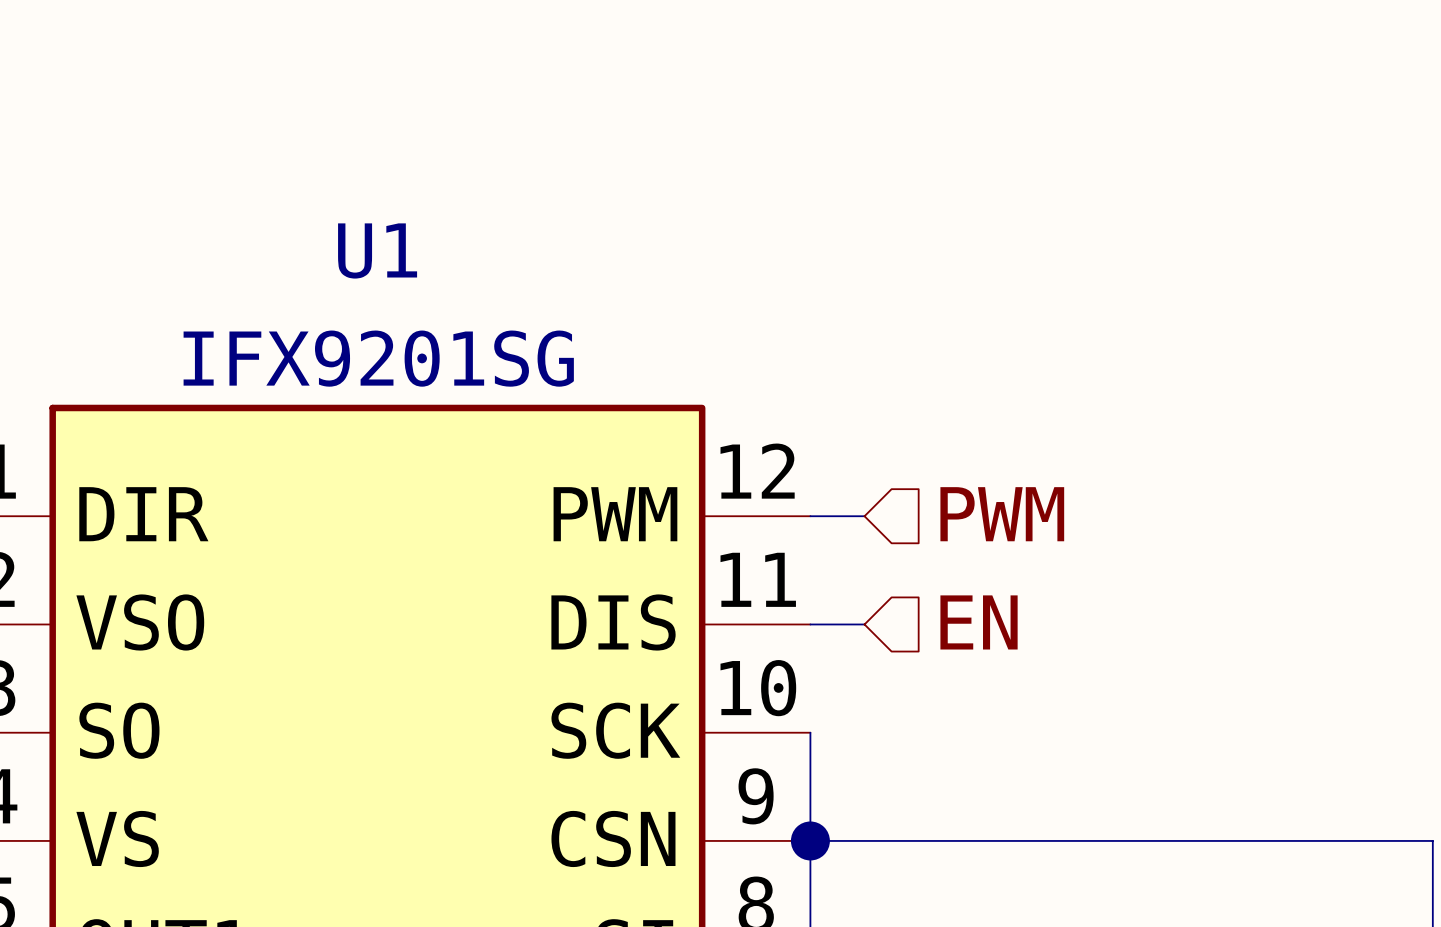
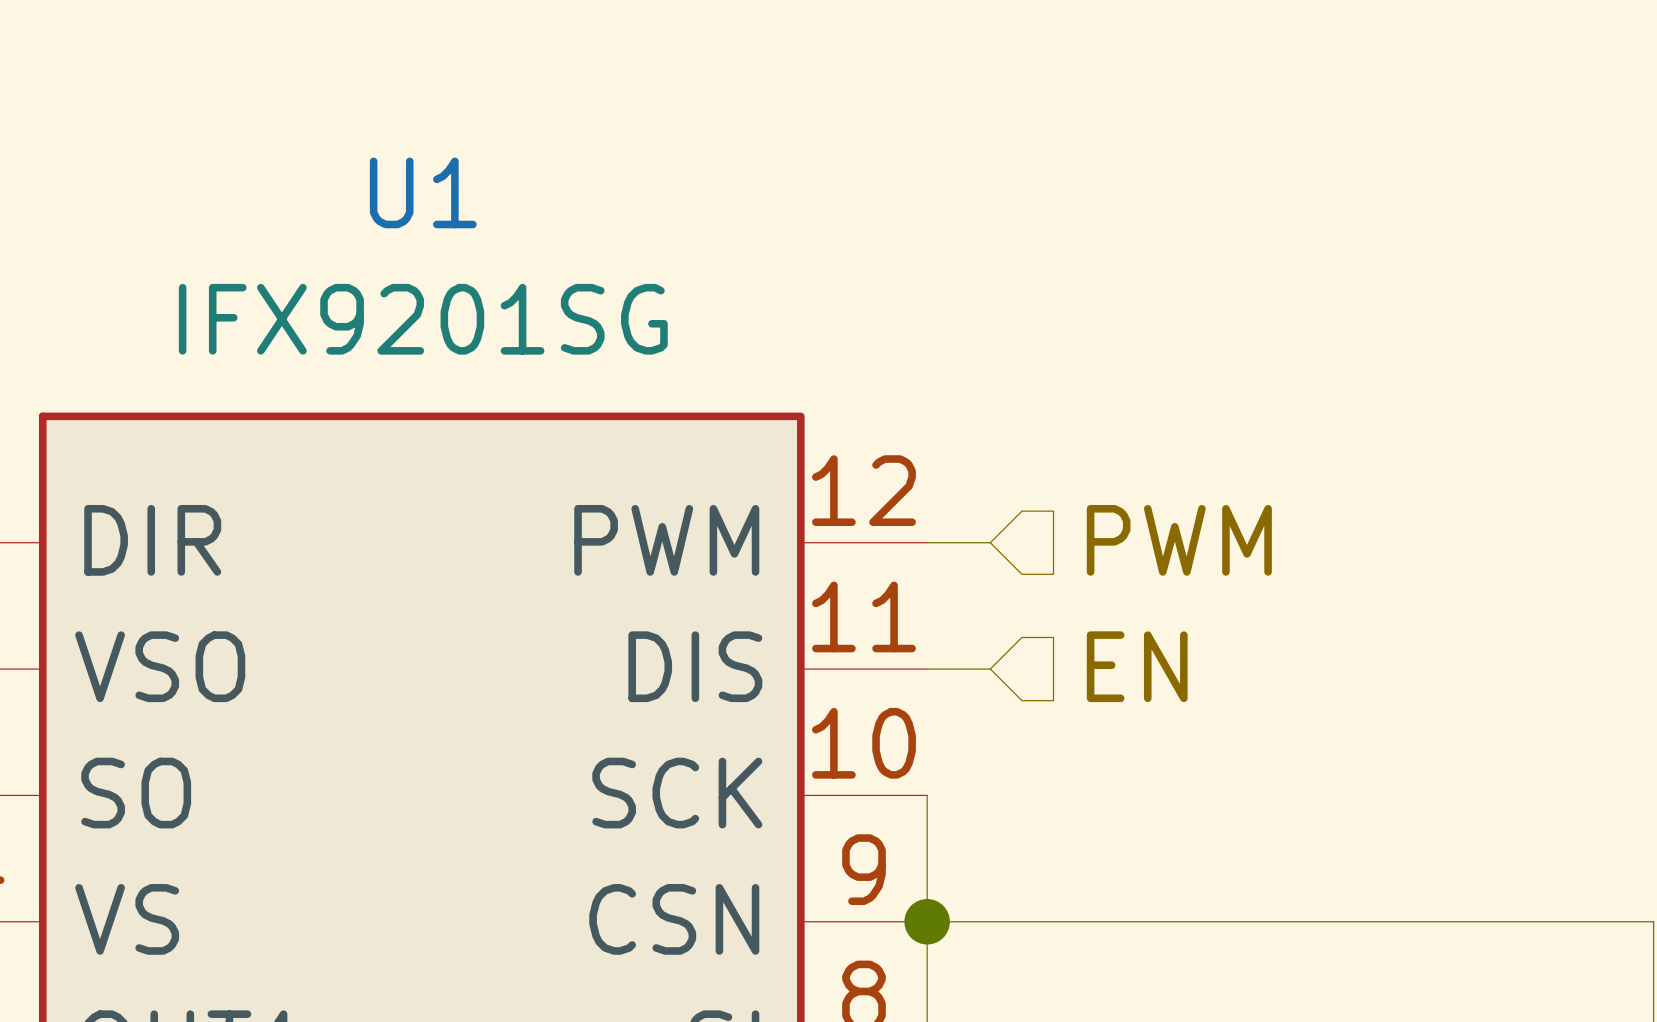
U1 name position: U1 (377, 250) -> U1 (423, 192)
U1 value position: IFX9201SG (378, 358) -> IFX9201SG (423, 319)

